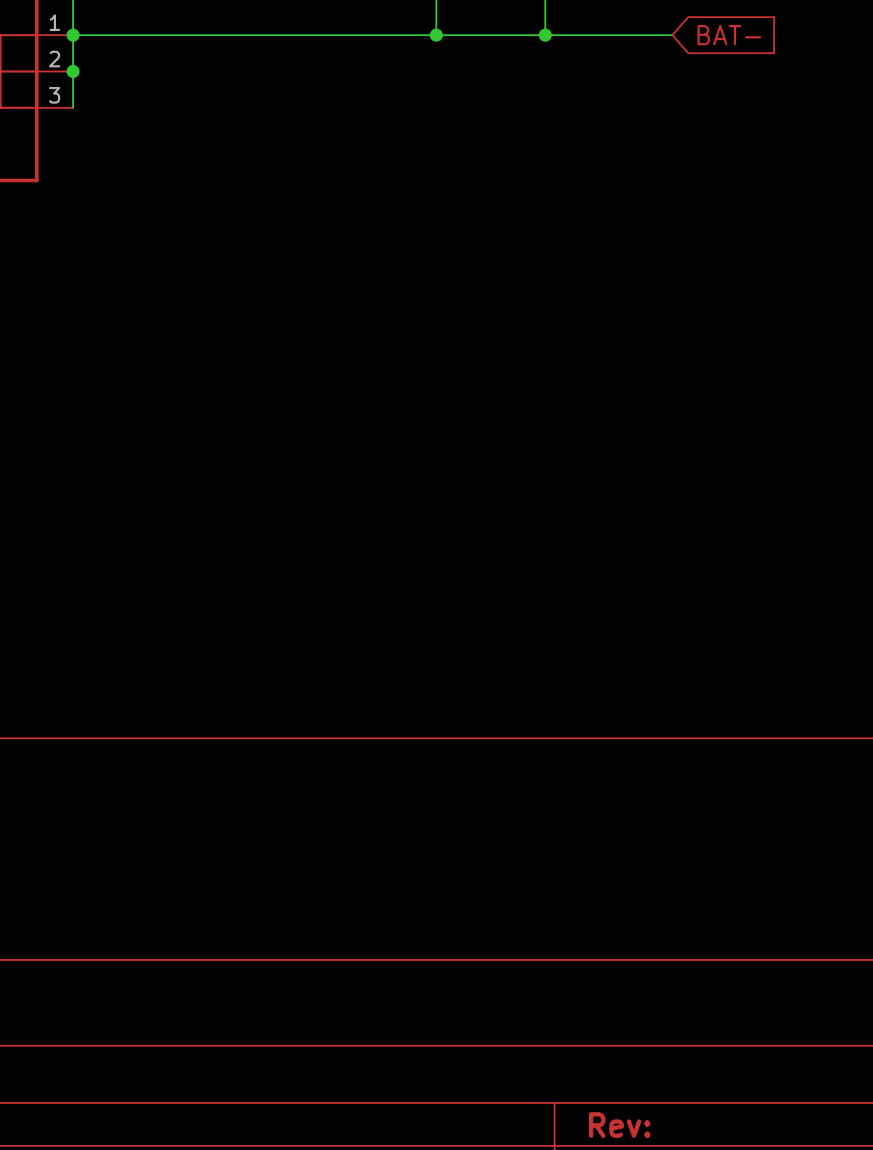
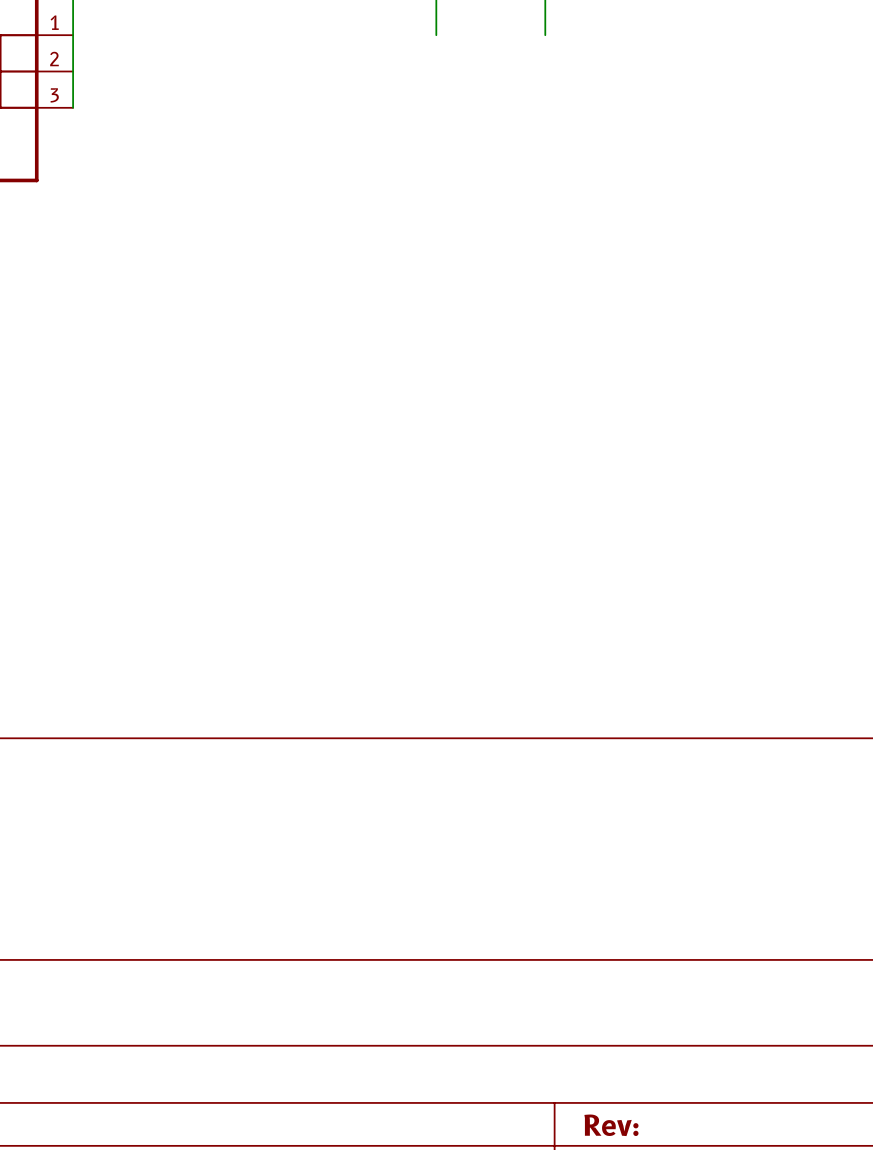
wire: (73, 35) (672, 35) -> none
junction: (73, 35) -> none
junction: (436, 35) -> none
junction: (545, 35) -> none
global label: BAT- (729, 35) -> none
junction: (73, 71) -> none

